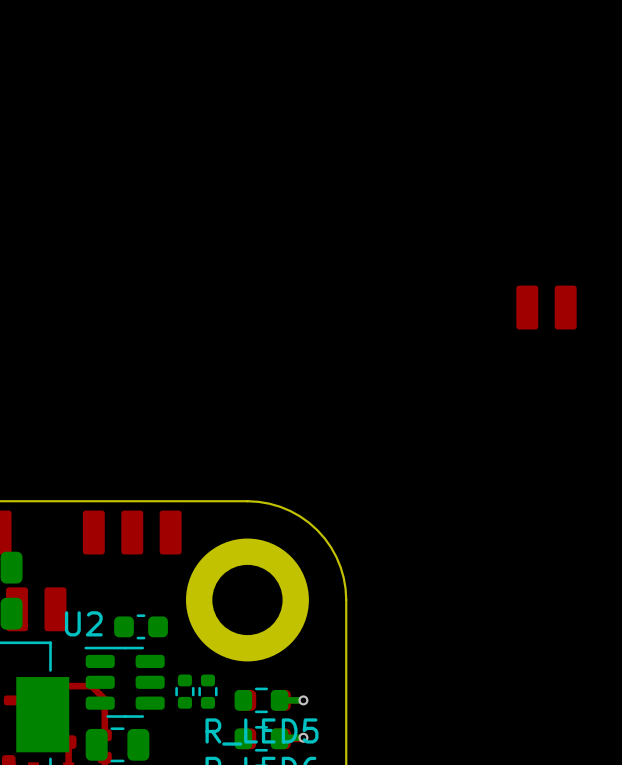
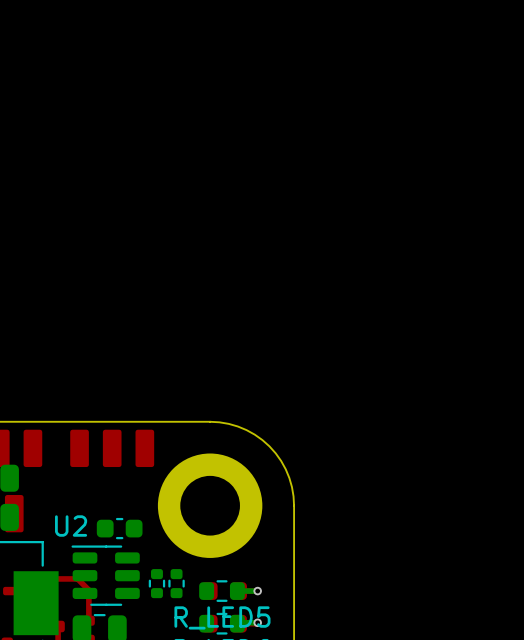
part: (527, 307) -> none
part: (565, 307) -> none
part position: (55, 609) -> (32, 448)

